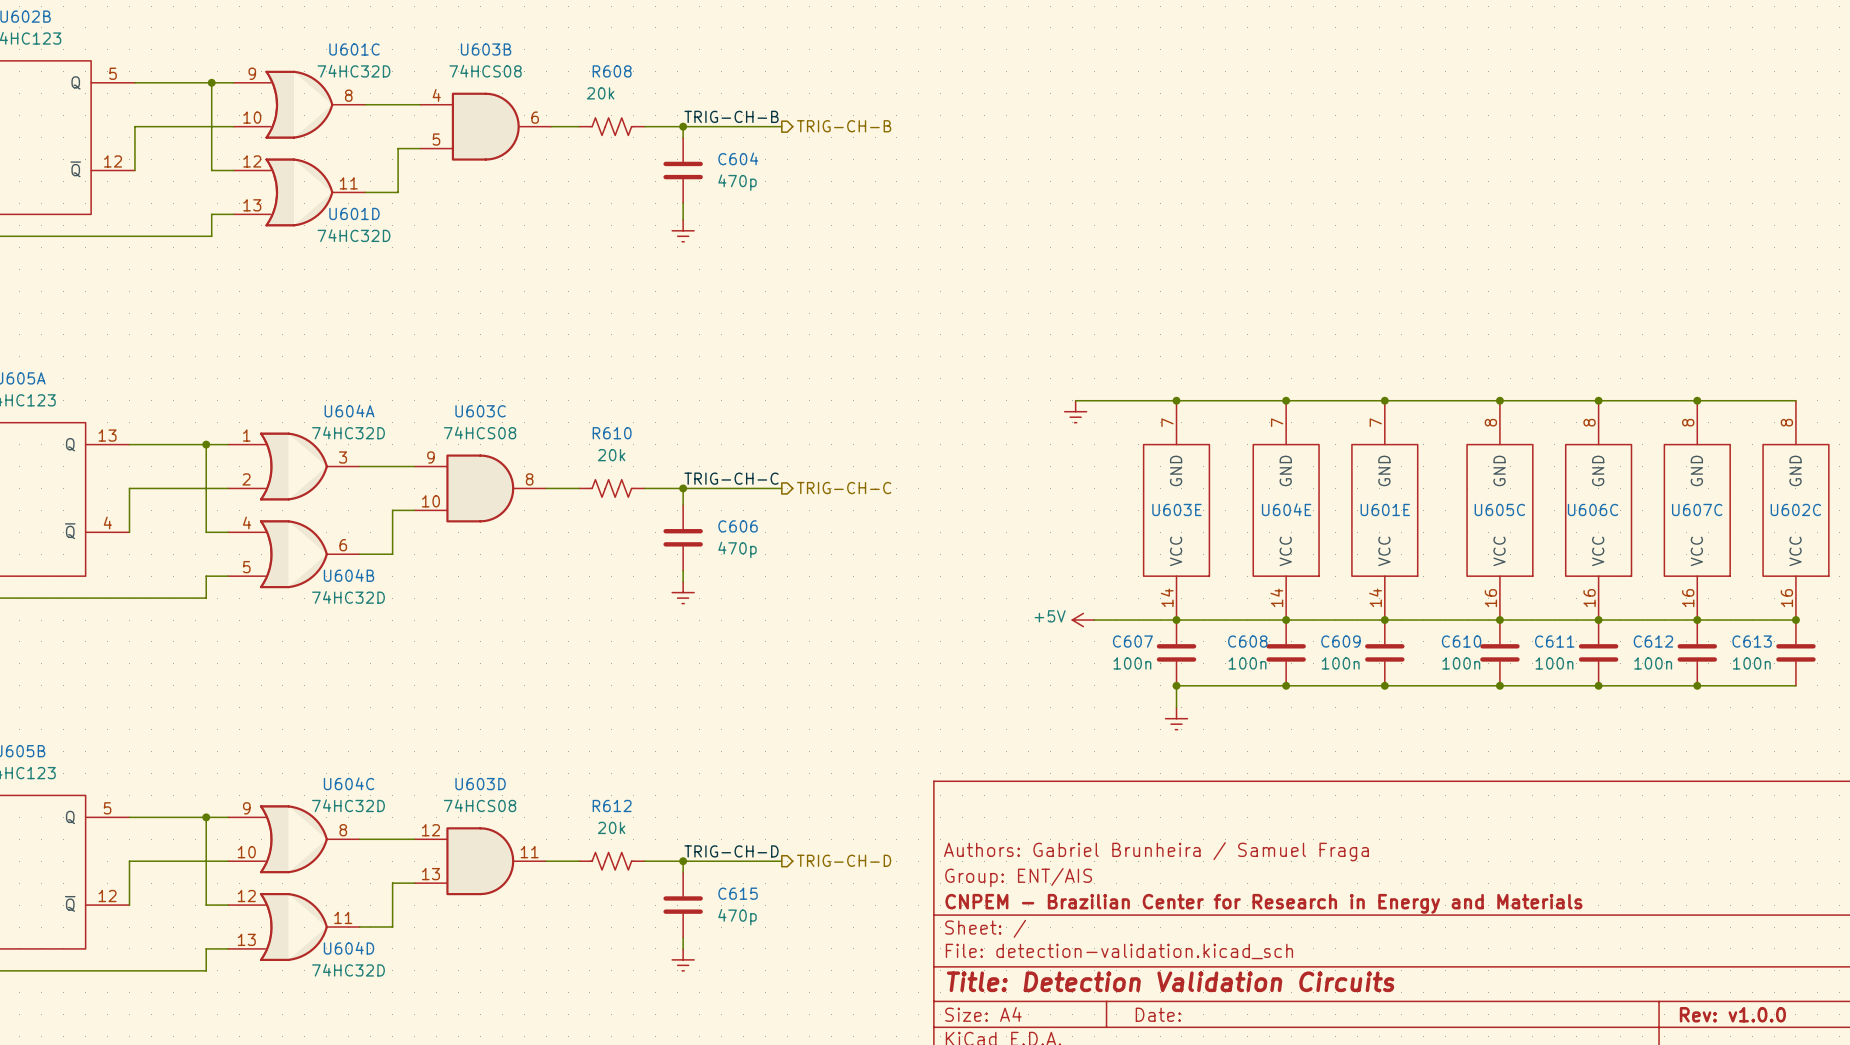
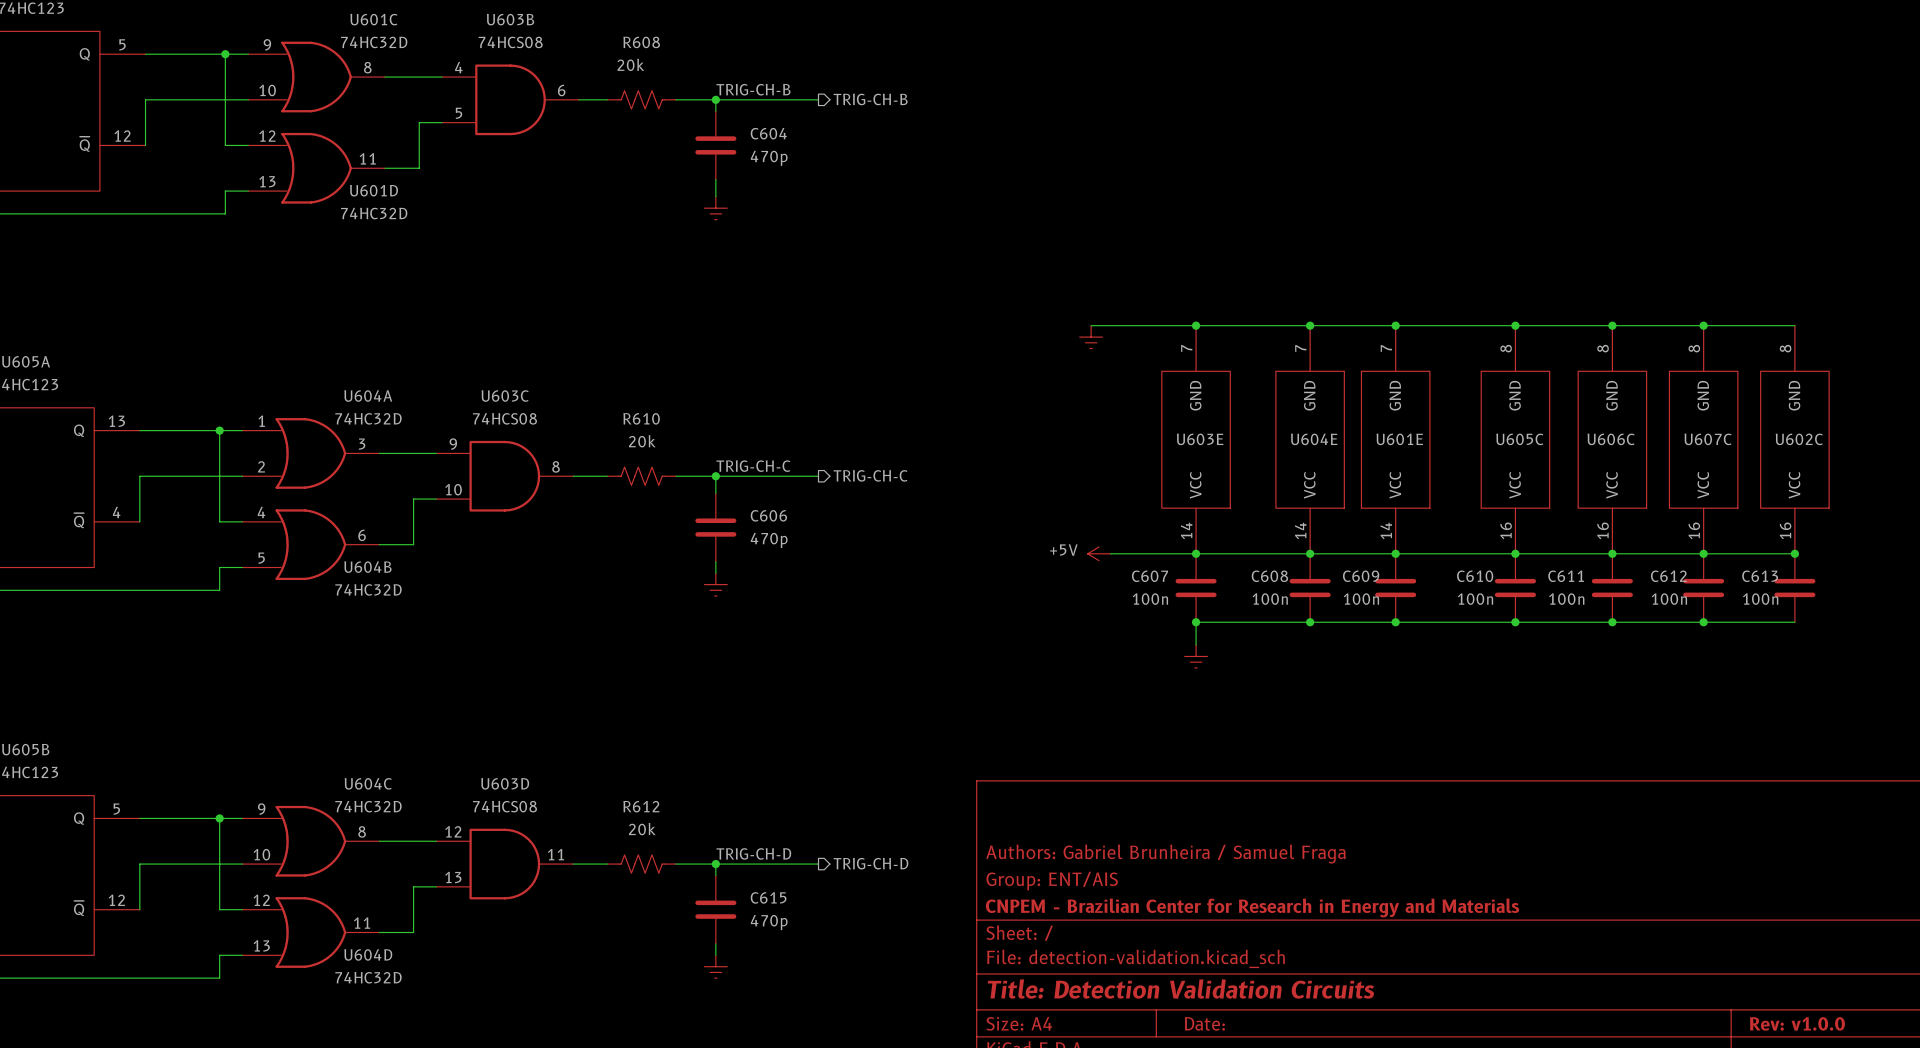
wire: none -> (1091, 325) (1794, 325)
junction: none -> (1196, 325)
junction: none -> (1310, 325)
junction: none -> (1395, 325)
junction: none -> (1515, 325)
junction: none -> (1612, 325)
junction: none -> (1703, 325)
wire: (1075, 400) (1795, 400) -> none
junction: (1176, 400) -> none
junction: (1286, 400) -> none
junction: (1384, 400) -> none
junction: (1499, 400) -> none
junction: (1598, 400) -> none
junction: (1697, 400) -> none
power symbol position: (1075, 411) -> (1091, 337)
U603E position: (1176, 510) -> (1196, 439)
U604E position: (1286, 510) -> (1310, 439)
U601E position: (1384, 510) -> (1395, 439)
U605C position: (1499, 510) -> (1515, 439)
U606C position: (1598, 510) -> (1612, 439)
U607C position: (1697, 510) -> (1703, 439)
U602C position: (1795, 510) -> (1794, 439)
wire: none -> (1110, 553) (1794, 553)
junction: none -> (1196, 553)
junction: none -> (1310, 553)
junction: none -> (1395, 553)
junction: none -> (1515, 553)
junction: none -> (1612, 553)
junction: none -> (1703, 553)
junction: none -> (1794, 553)
power symbol position: +5V (1083, 620) -> +5V (1099, 553)
wire: (1094, 620) (1795, 620) -> none
junction: (1176, 620) -> none
junction: (1286, 620) -> none
junction: (1384, 620) -> none
junction: (1499, 620) -> none
junction: (1598, 620) -> none
junction: (1697, 620) -> none
junction: (1795, 620) -> none
junction: none -> (1196, 622)
junction: none -> (1310, 622)
junction: none -> (1395, 622)
junction: none -> (1515, 622)
junction: none -> (1612, 622)
junction: none -> (1703, 622)
wire: none -> (1794, 622) (1196, 622) (1196, 645)
C609 name position: C609 (1340, 641) -> C609 (1361, 576)
C612 name position: C612 (1653, 641) -> C612 (1668, 576)
C613 name position: C613 (1752, 641) -> C613 (1760, 576)
C607 position: (1176, 652) -> (1196, 588)
C608 position: (1286, 652) -> (1310, 588)
C609 position: (1384, 652) -> (1395, 588)
C610 position: (1499, 652) -> (1515, 588)
C611 position: (1598, 652) -> (1612, 588)
C612 position: (1697, 652) -> (1703, 588)
C613 position: (1795, 652) -> (1794, 588)
C609 value position: 100n (1340, 663) -> 100n (1361, 599)
C612 value position: 100n (1653, 663) -> 100n (1669, 599)
C613 value position: 100n (1751, 663) -> 100n (1760, 599)
junction: (1176, 685) -> none
junction: (1286, 685) -> none
junction: (1384, 685) -> none
junction: (1499, 685) -> none
junction: (1598, 685) -> none
junction: (1697, 685) -> none
wire: (1795, 685) (1176, 685) (1176, 707) -> none
power symbol position: (1176, 718) -> (1196, 656)

